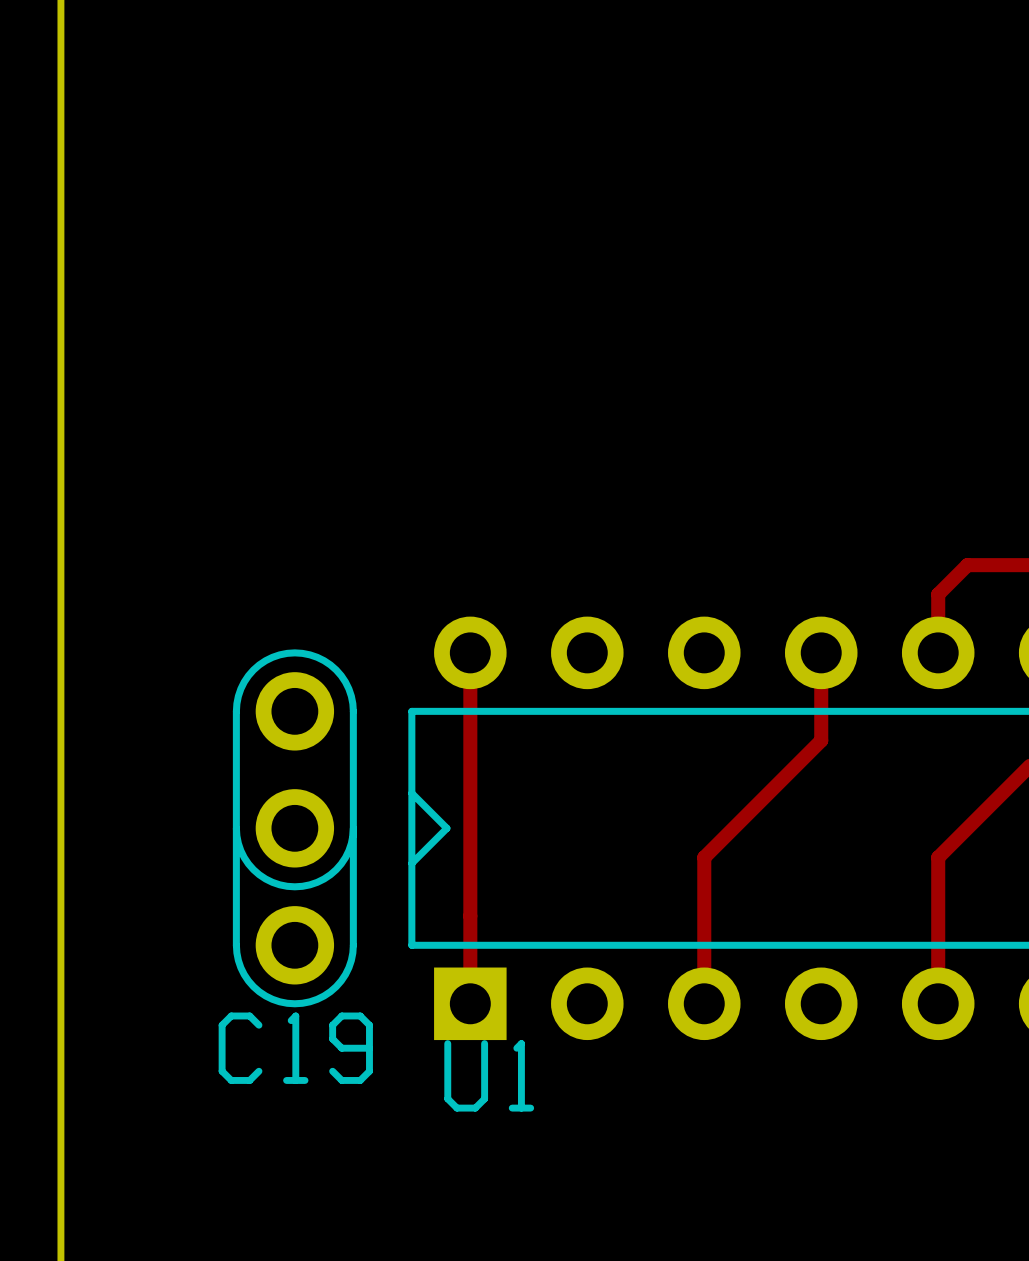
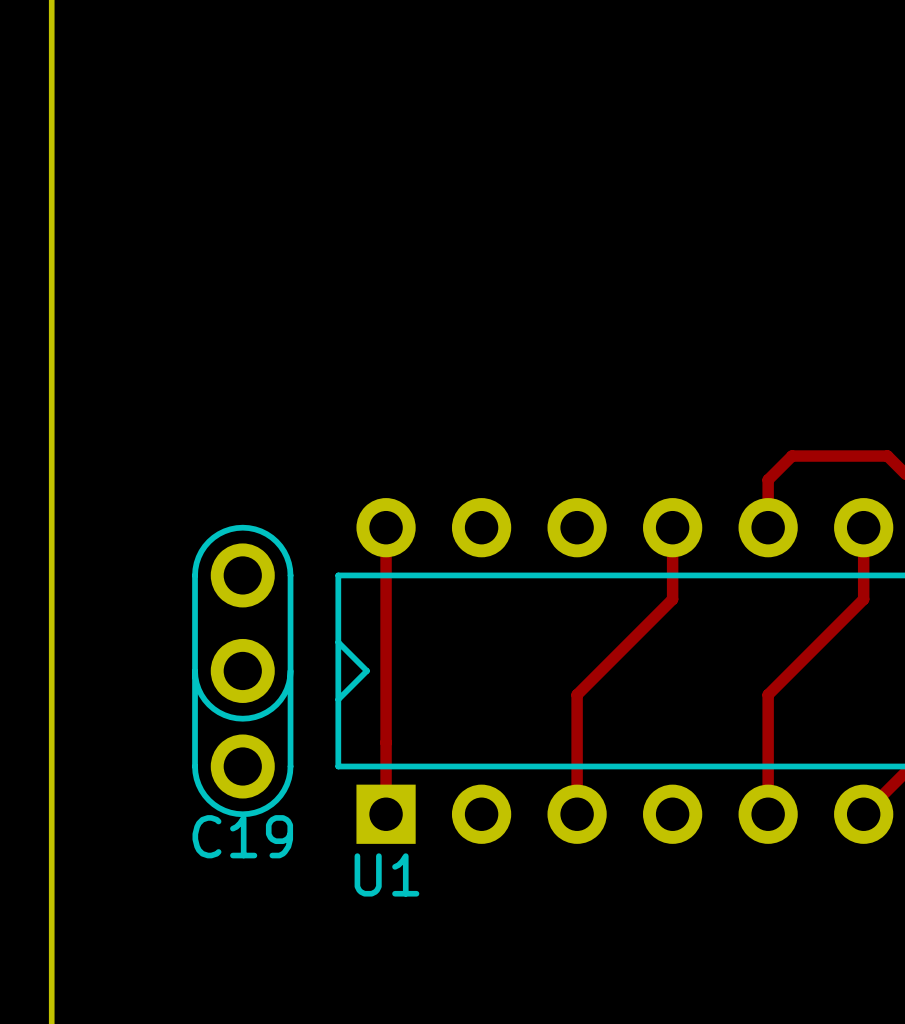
line: (291, 1020) (295, 1015) (295, 1080) -> none
line: (258, 1025) (249, 1015) (231, 1015) (222, 1025) (222, 1071) (231, 1080) (249, 1080) (258, 1071) -> none
C19 name: none -> C19 (242, 836)
line: (447, 1043) (447, 1098) (456, 1108) (475, 1108) (484, 1098) (484, 1043) -> none
line: (369, 1048) (341, 1048) (332, 1039) (332, 1025) (341, 1015) (360, 1015) (369, 1025) (369, 1071) (360, 1080) (341, 1080) (332, 1071) -> none
line: (516, 1048) (521, 1043) (521, 1108) -> none
U1 name: none -> U1 (386, 874)
line: (286, 1080) (305, 1080) -> none
line: (512, 1108) (530, 1108) -> none

